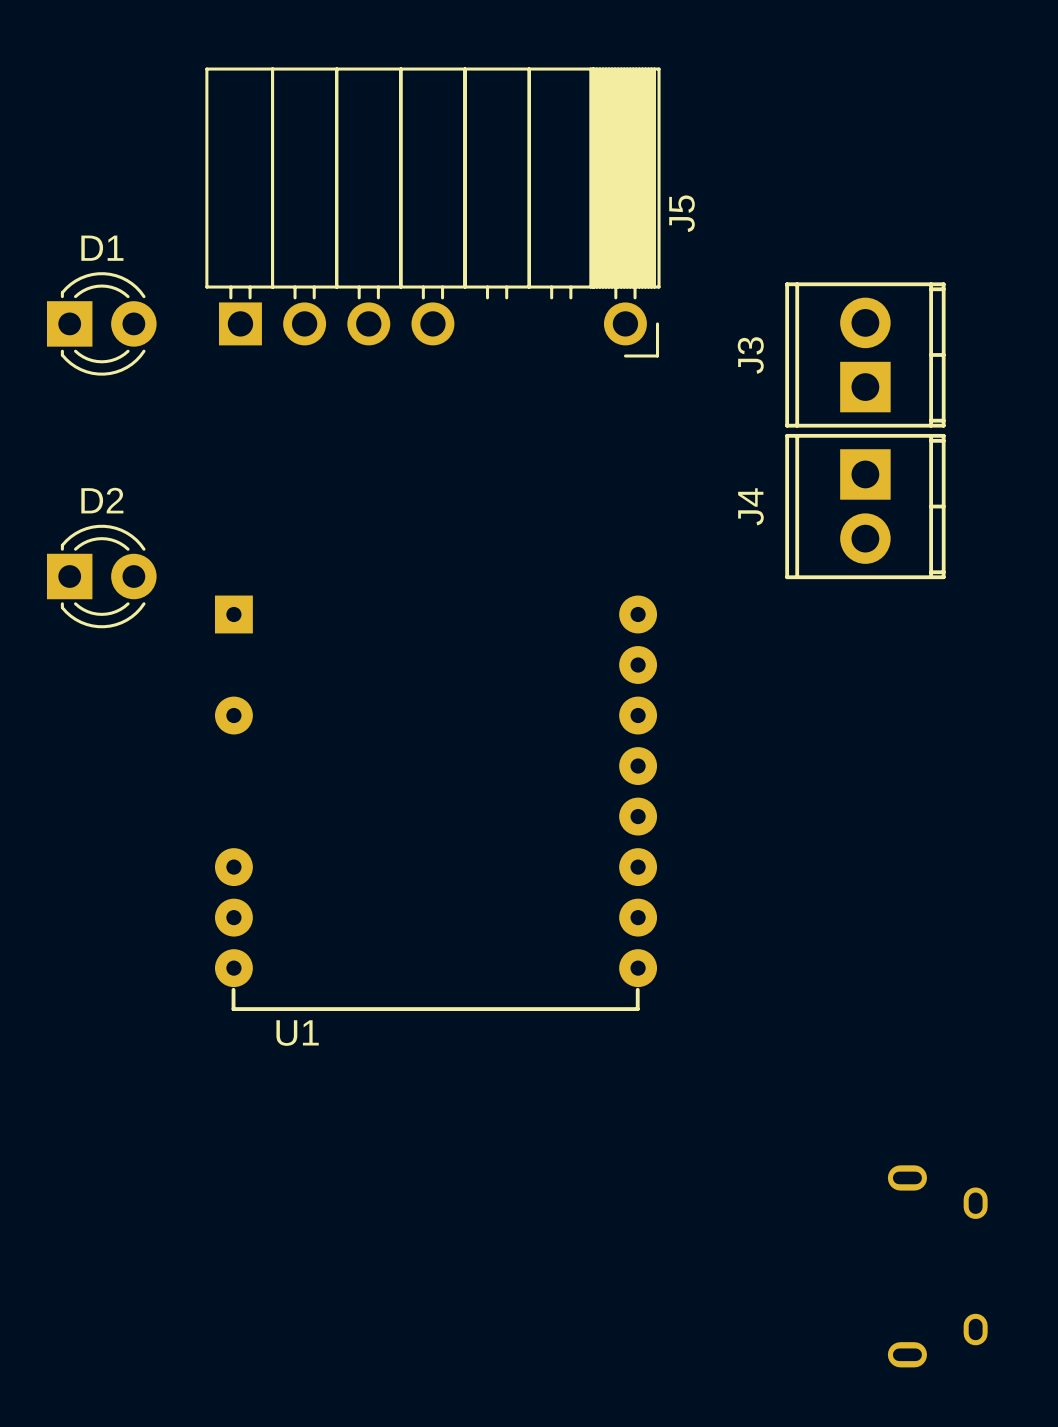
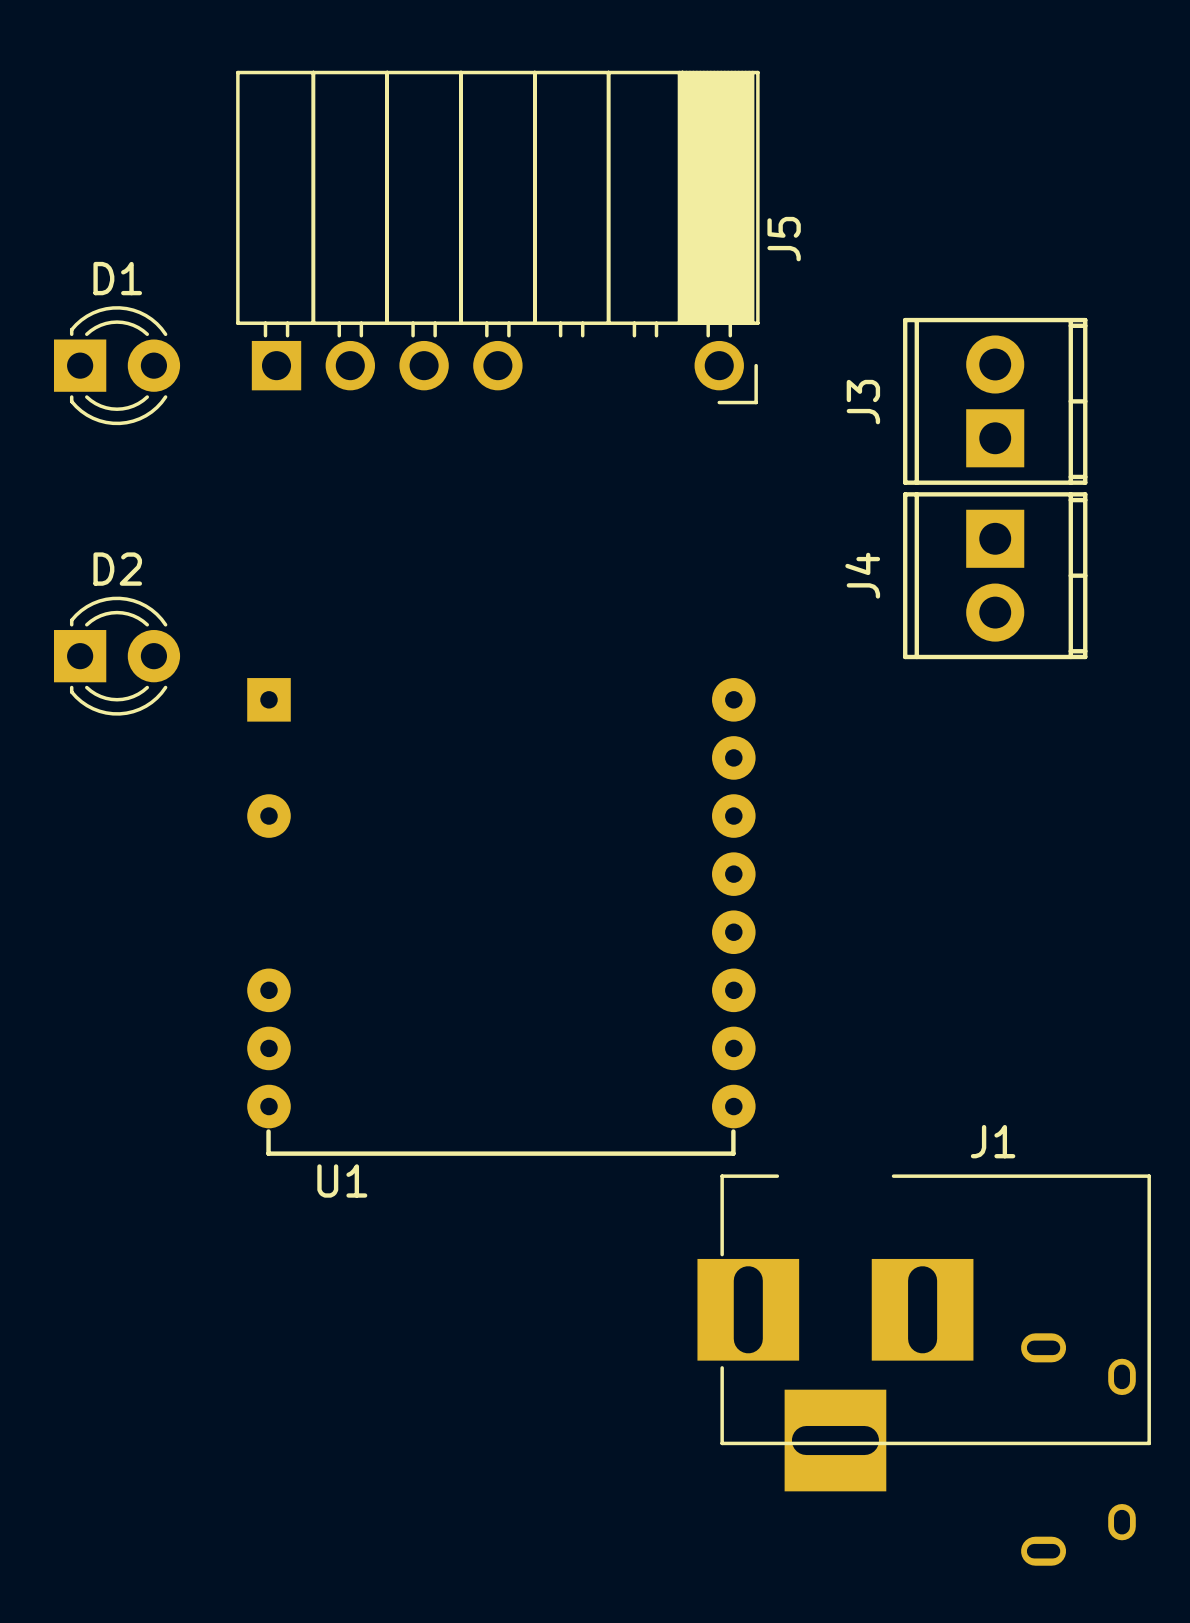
J1: none -> (924, 1332)

